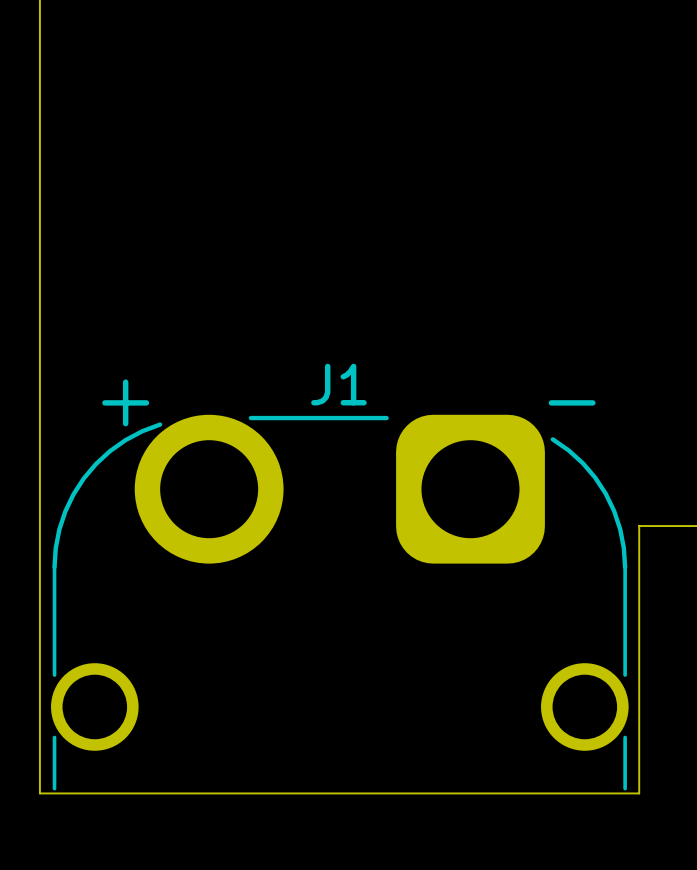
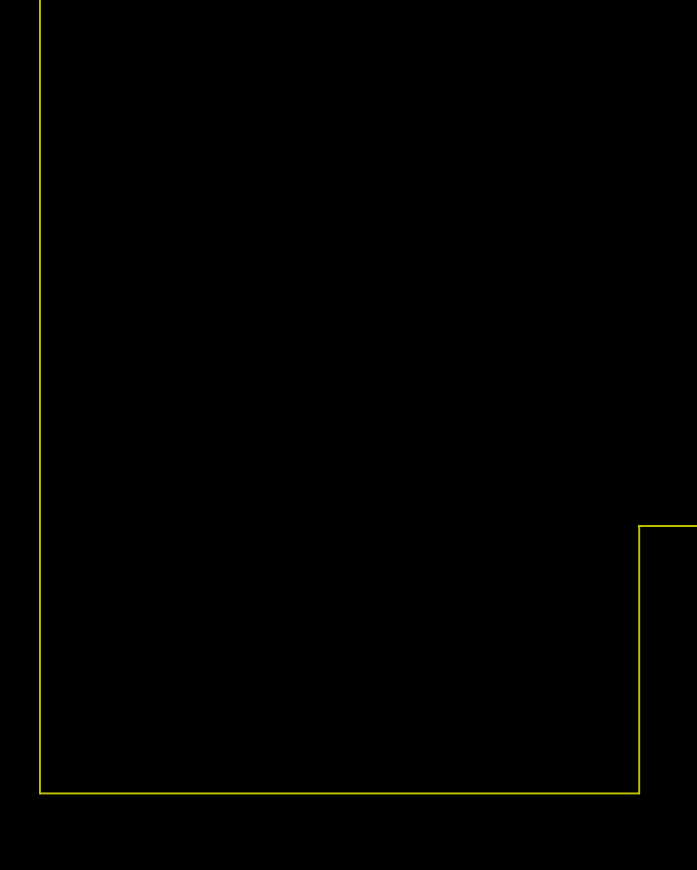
J1: (339, 602) -> none

